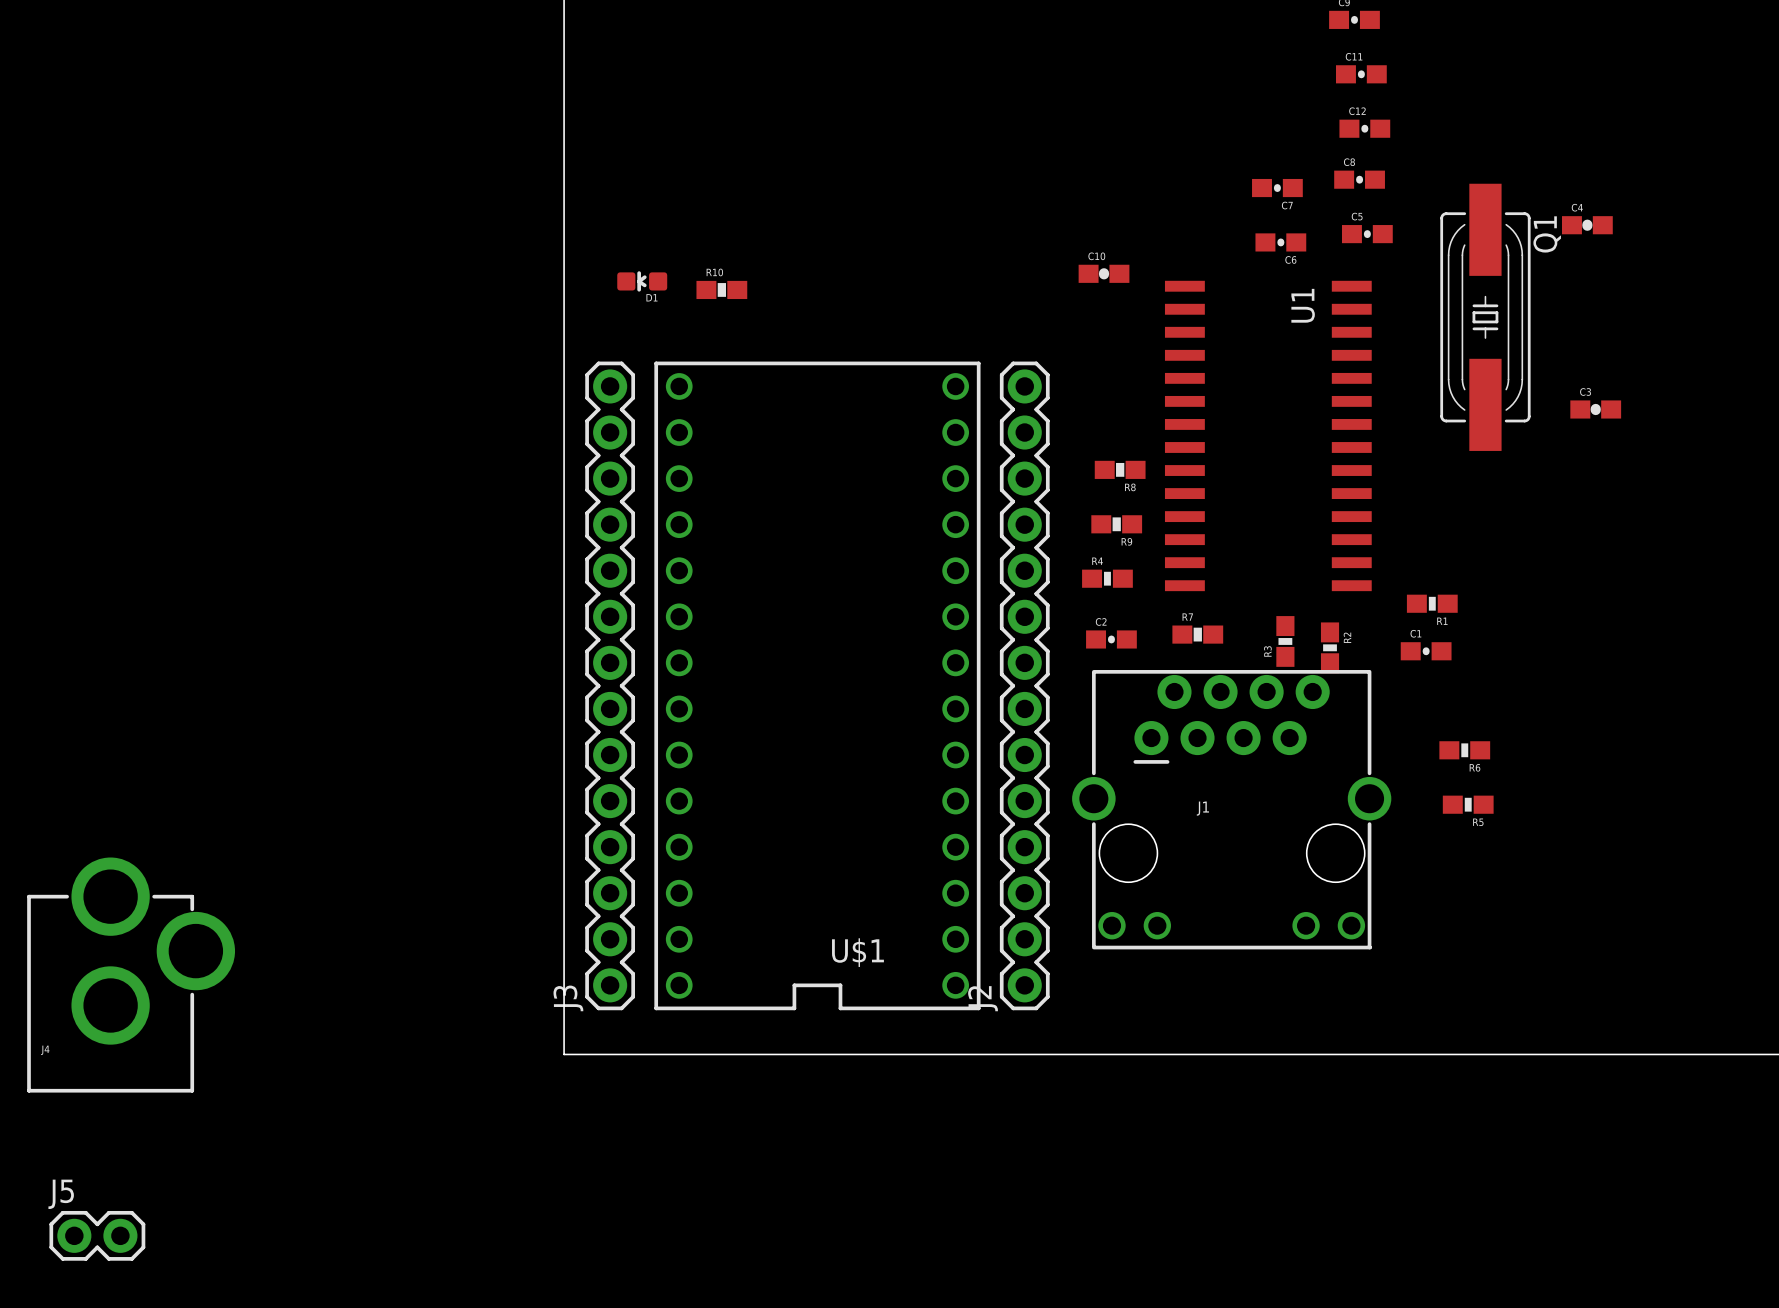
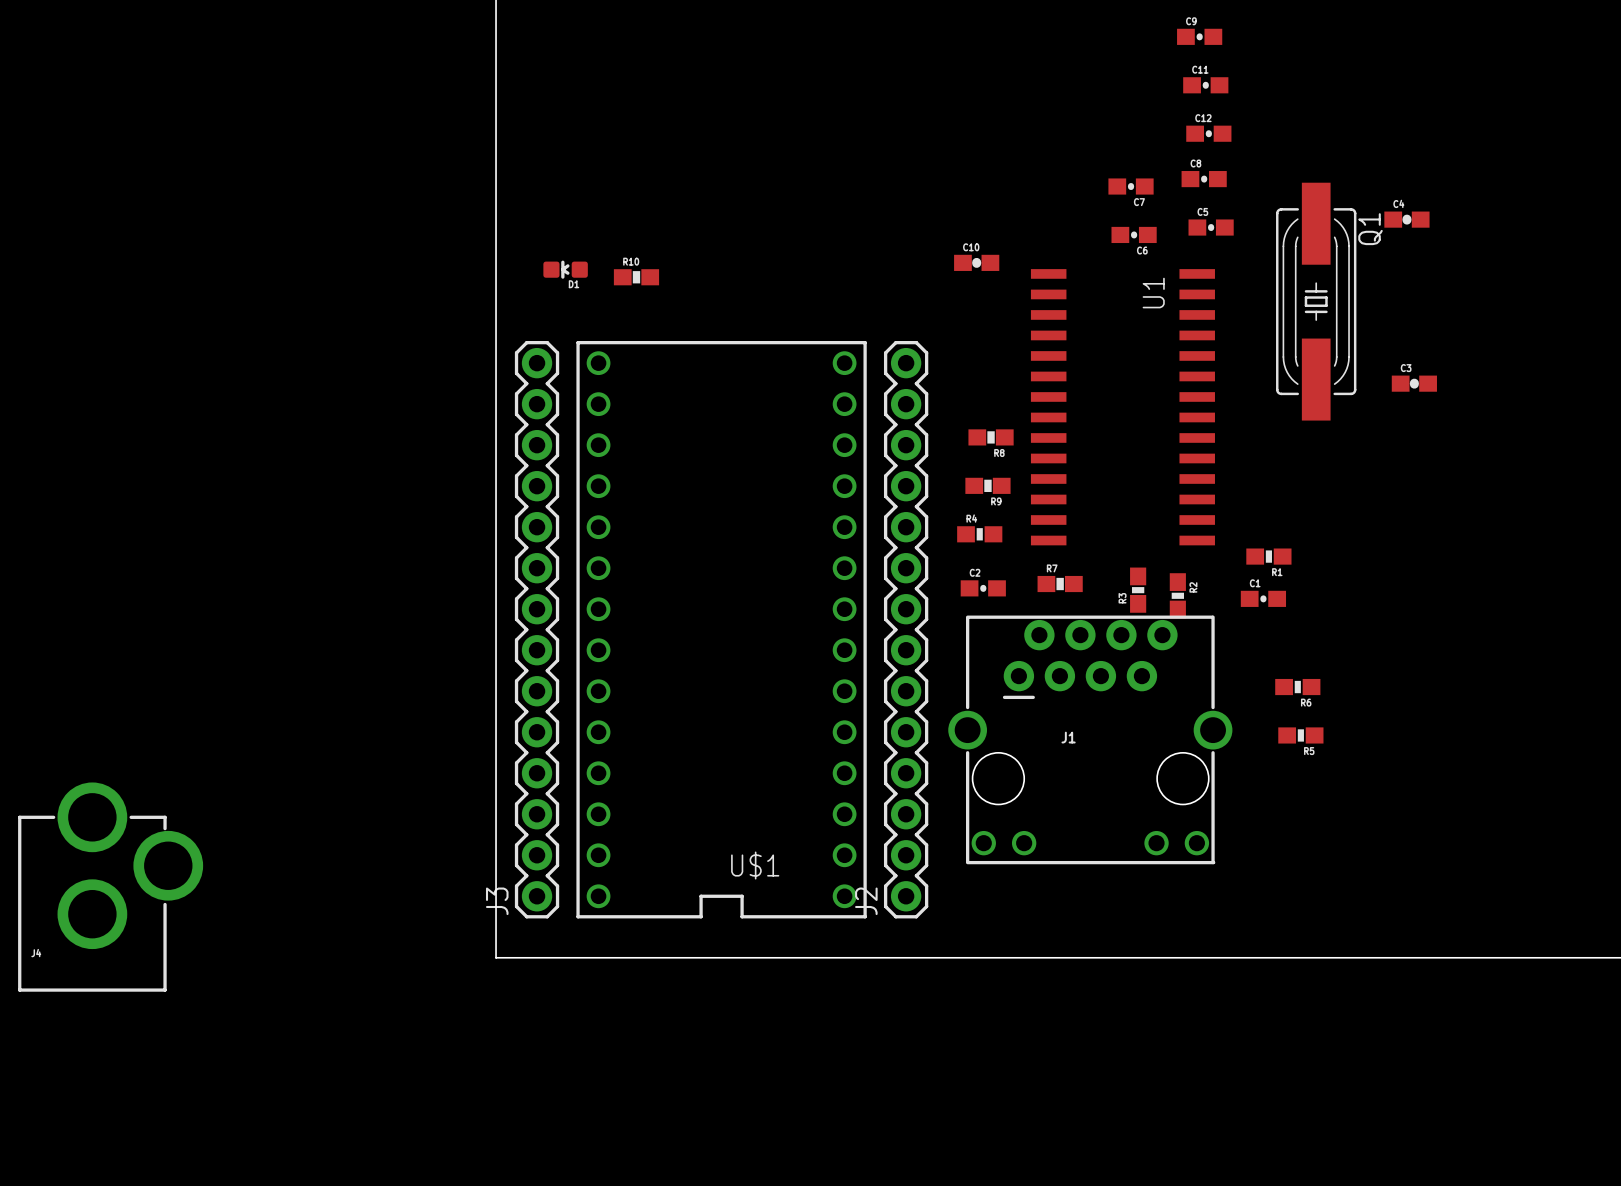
J5: (97, 1235) -> none

